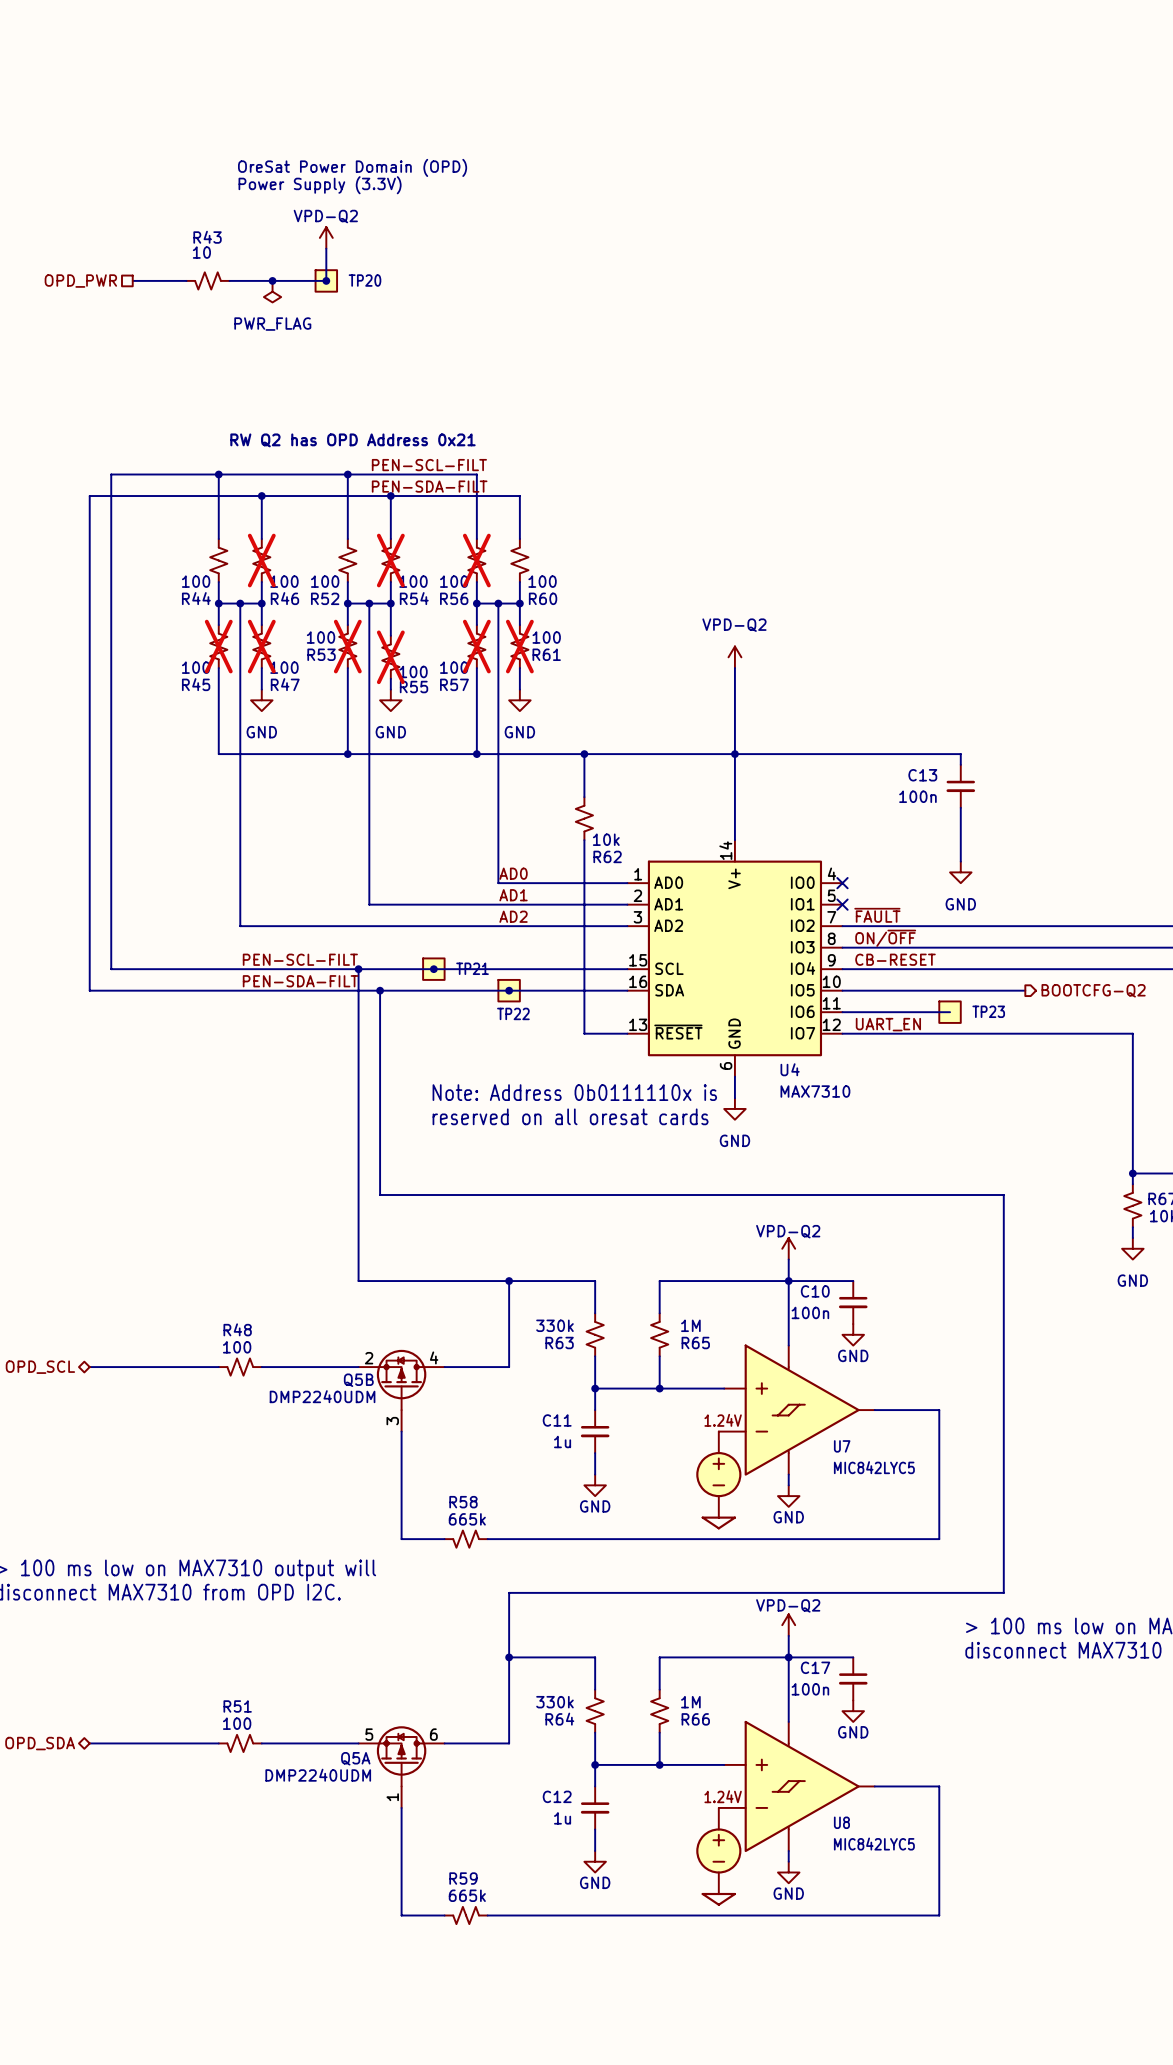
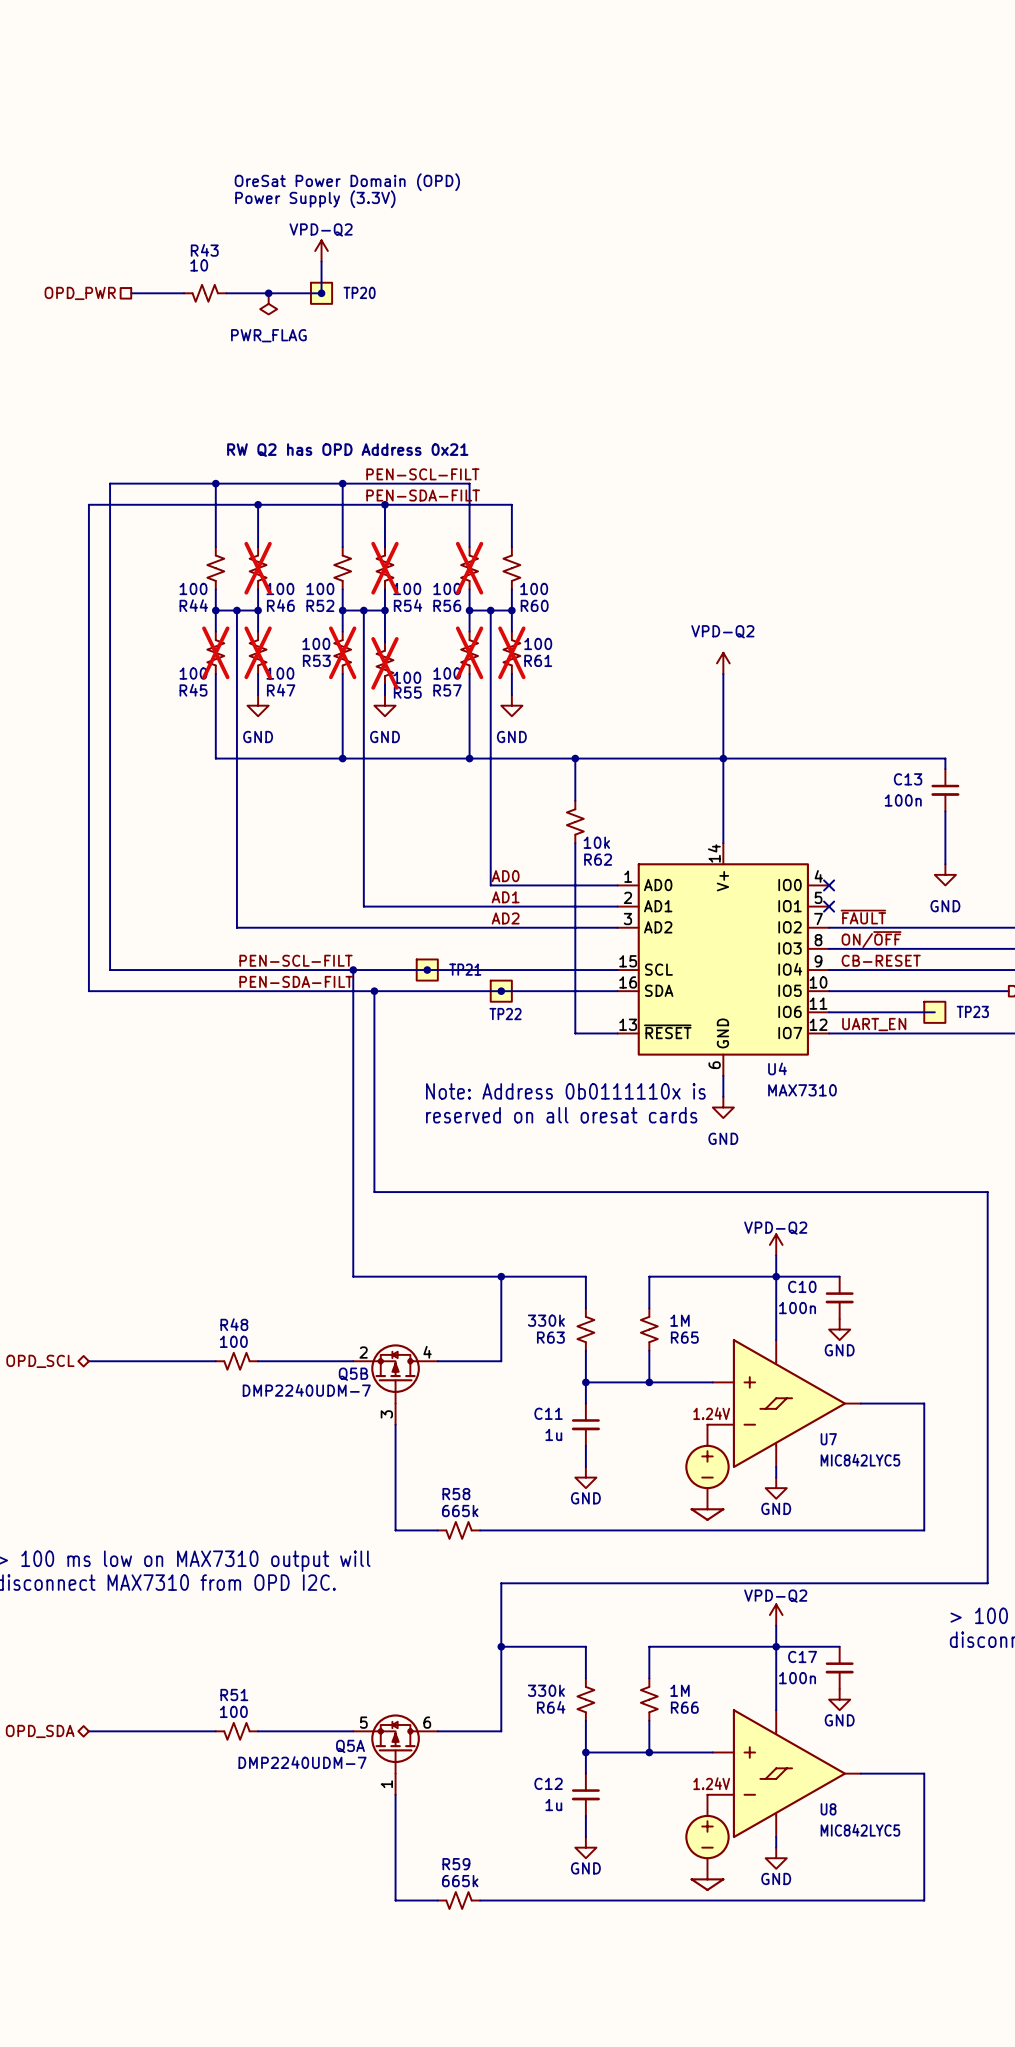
Q5B value: DMP2240UDM (322, 1396) -> DMP2240UDM-7 (306, 1390)
Q5A value: DMP2240UDM (318, 1775) -> DMP2240UDM-7 (302, 1762)

